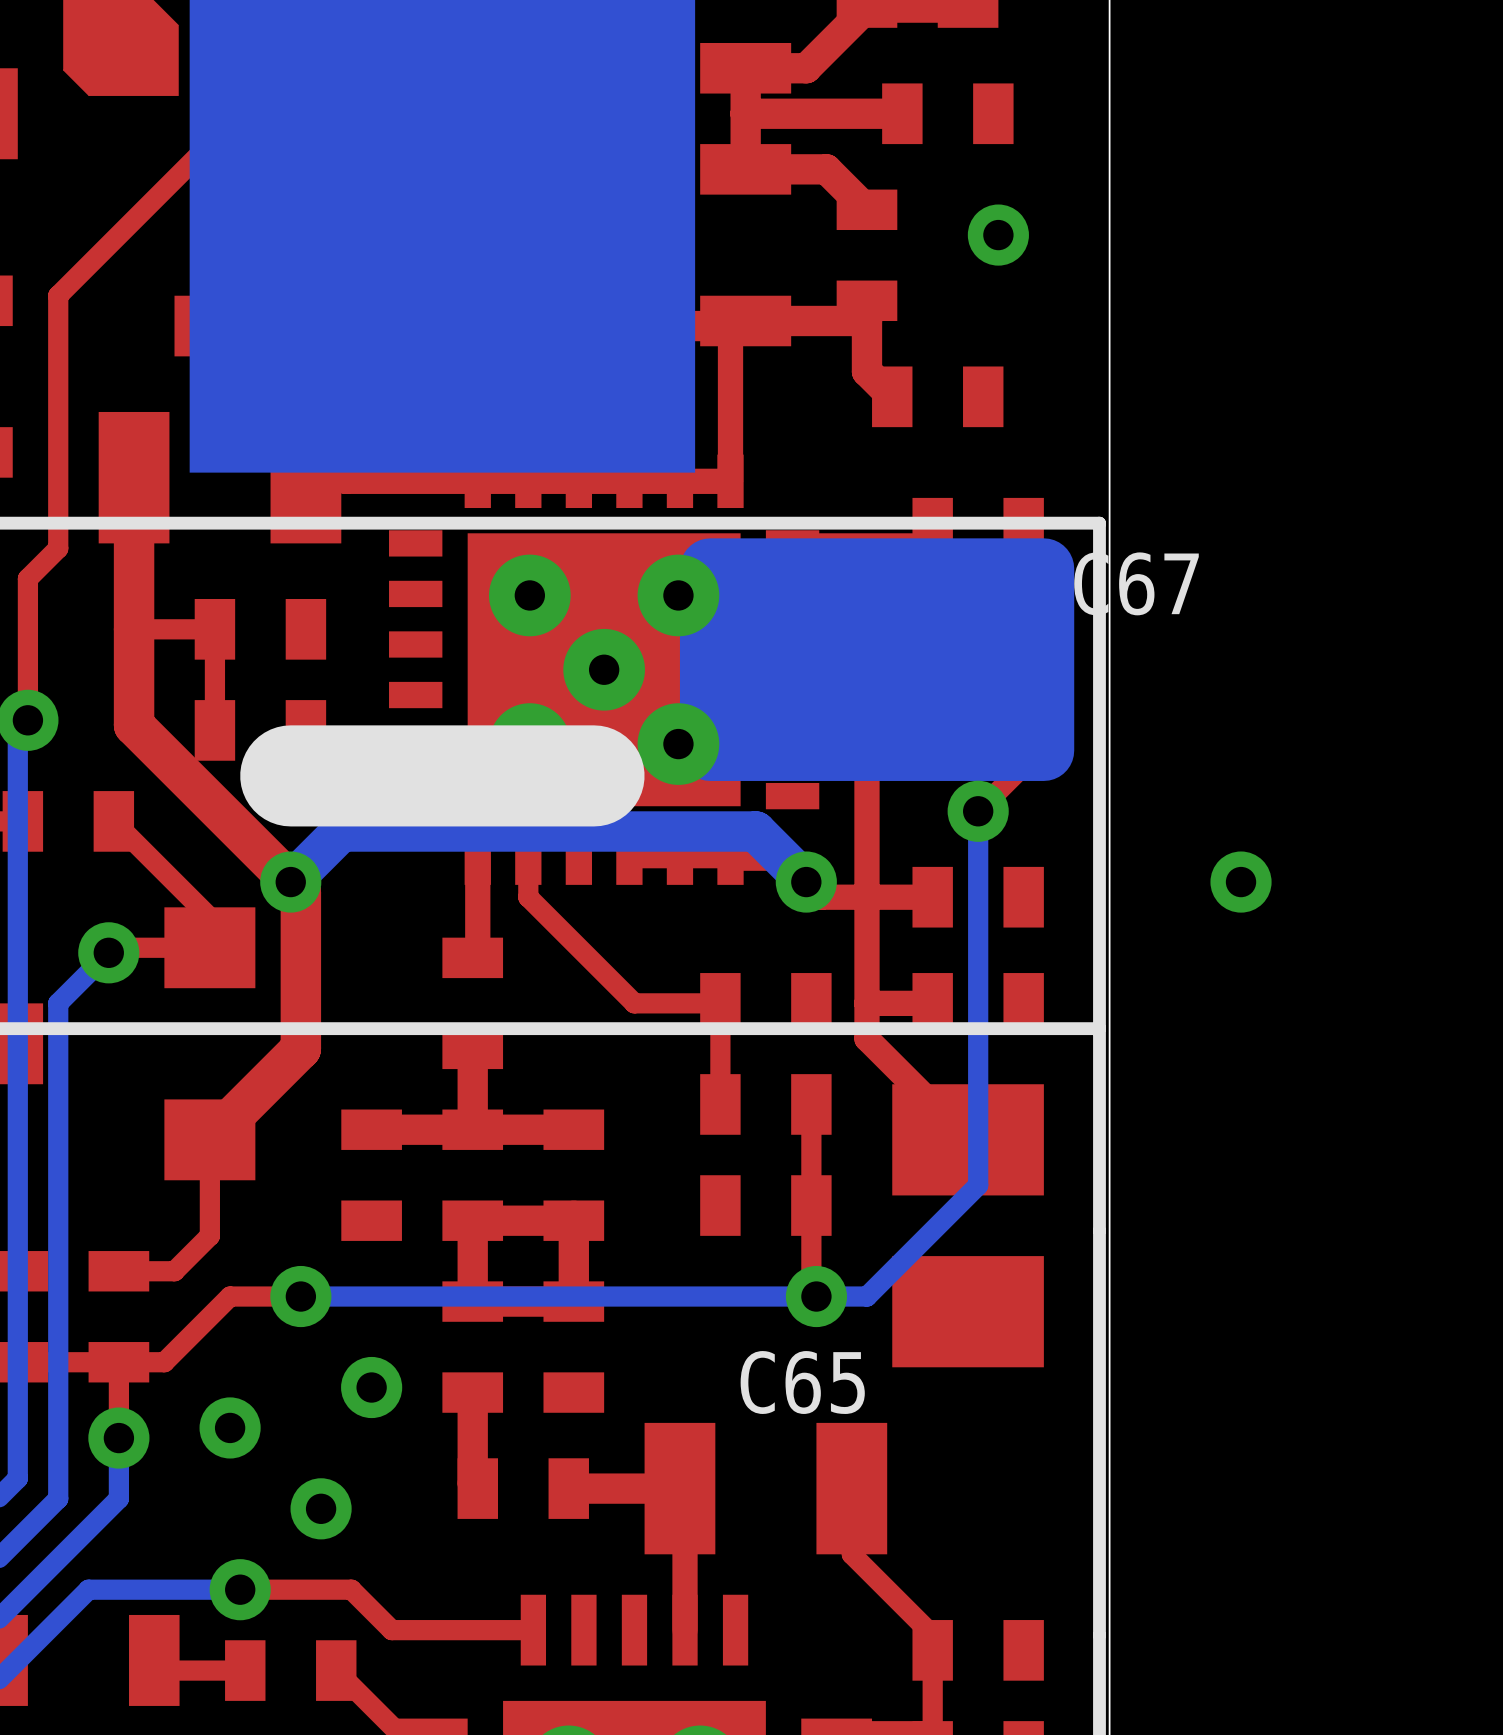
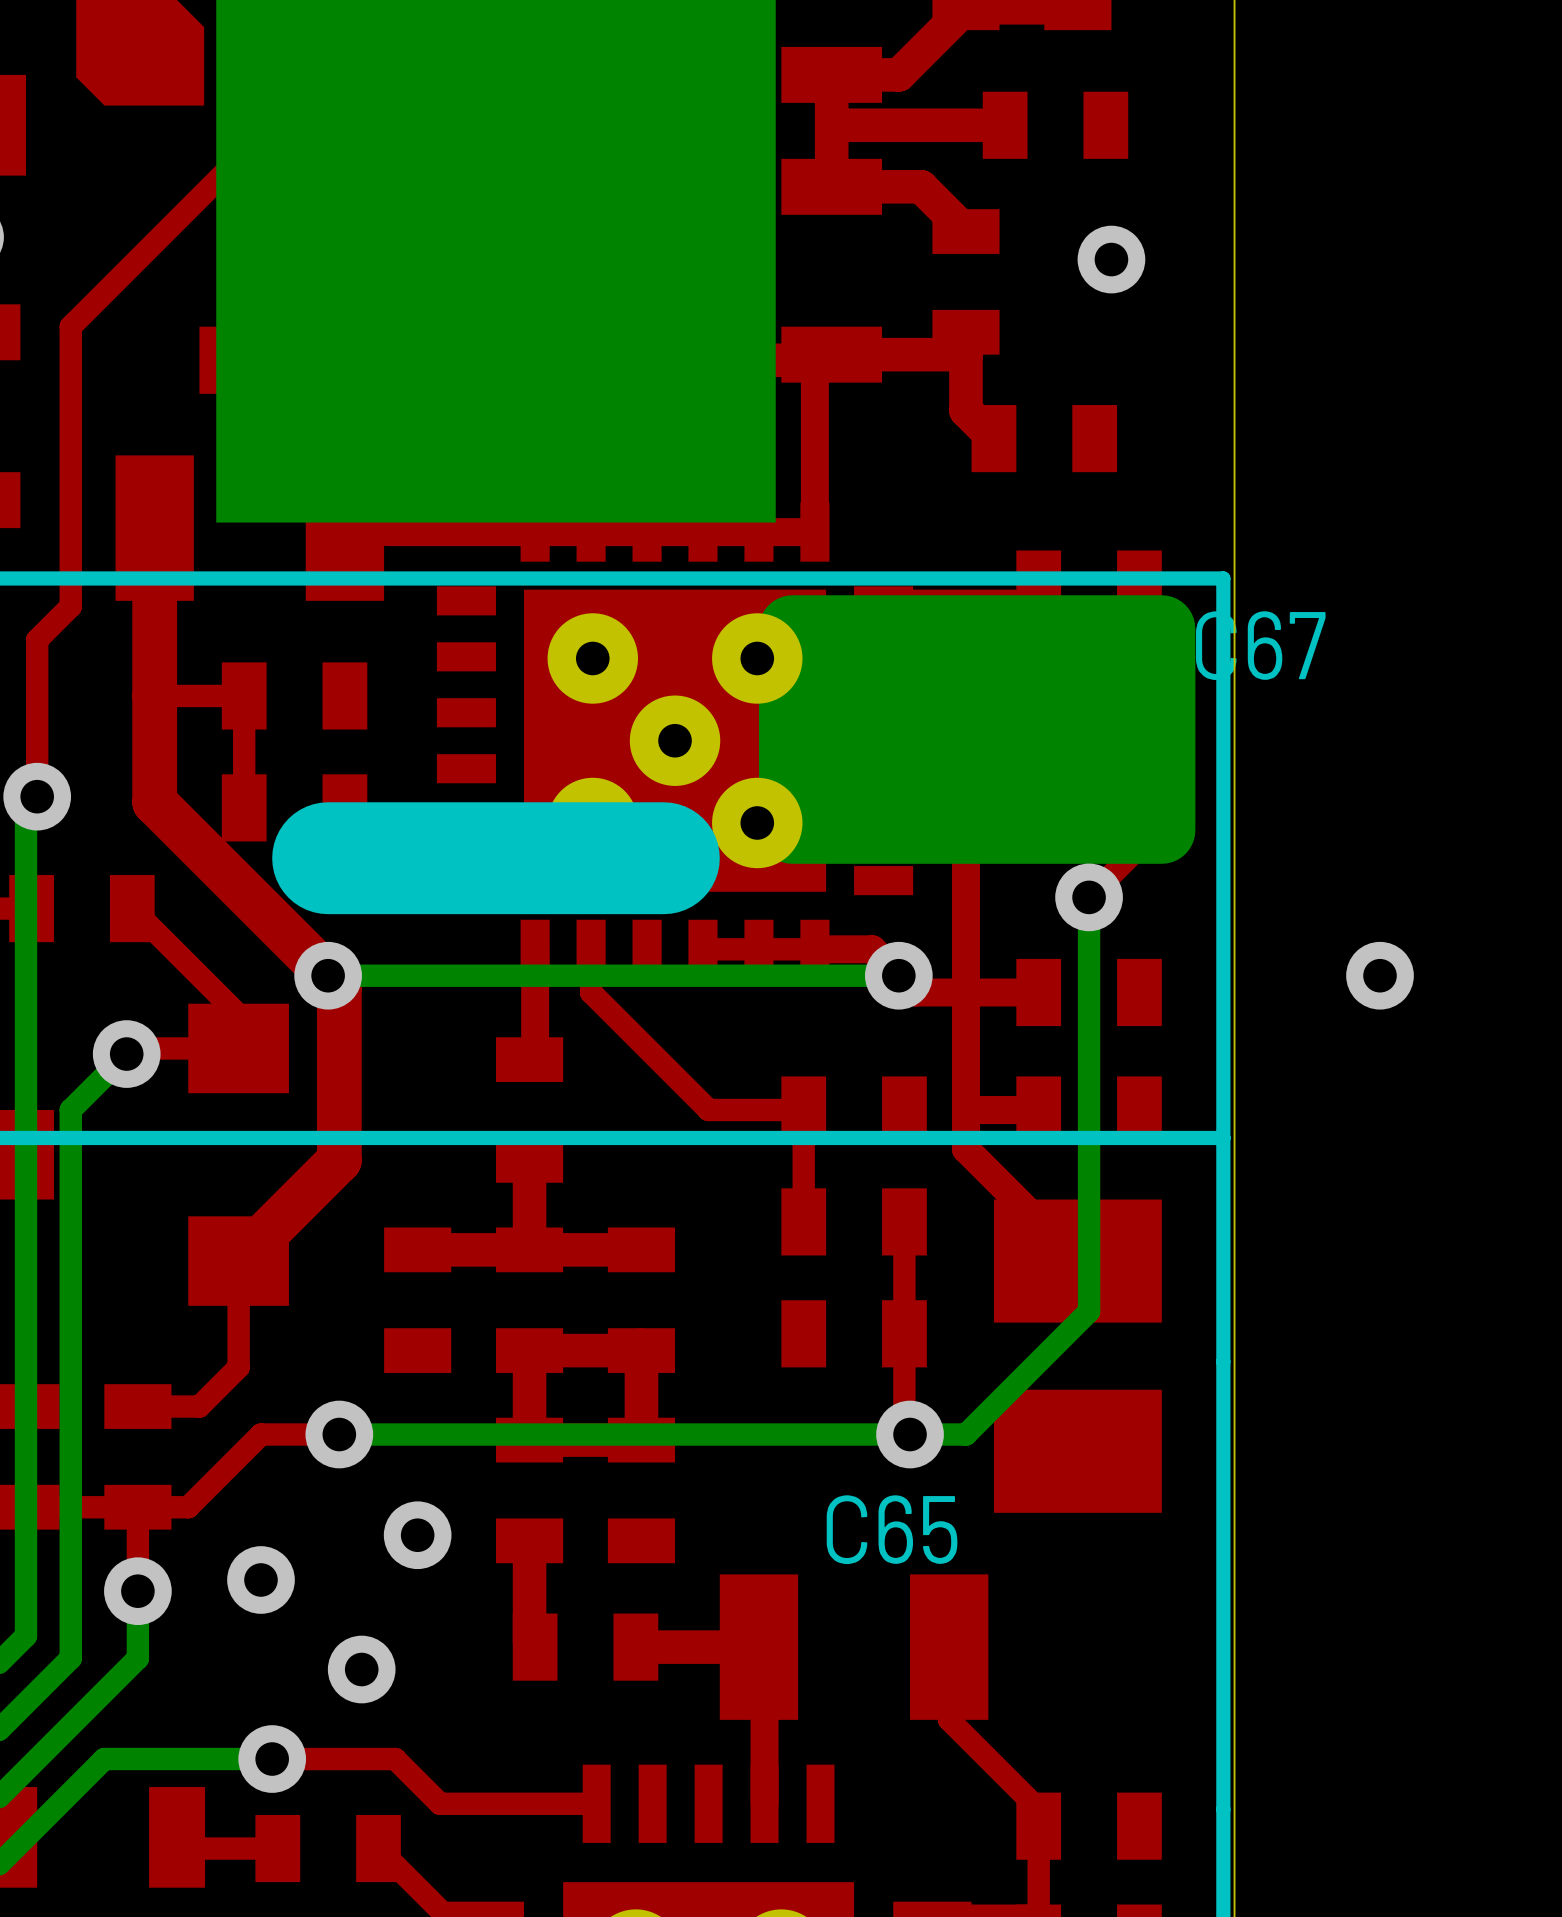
bottom track: (806, 882) (755, 831) (341, 831) (290, 882) -> (898, 975) (328, 975)

